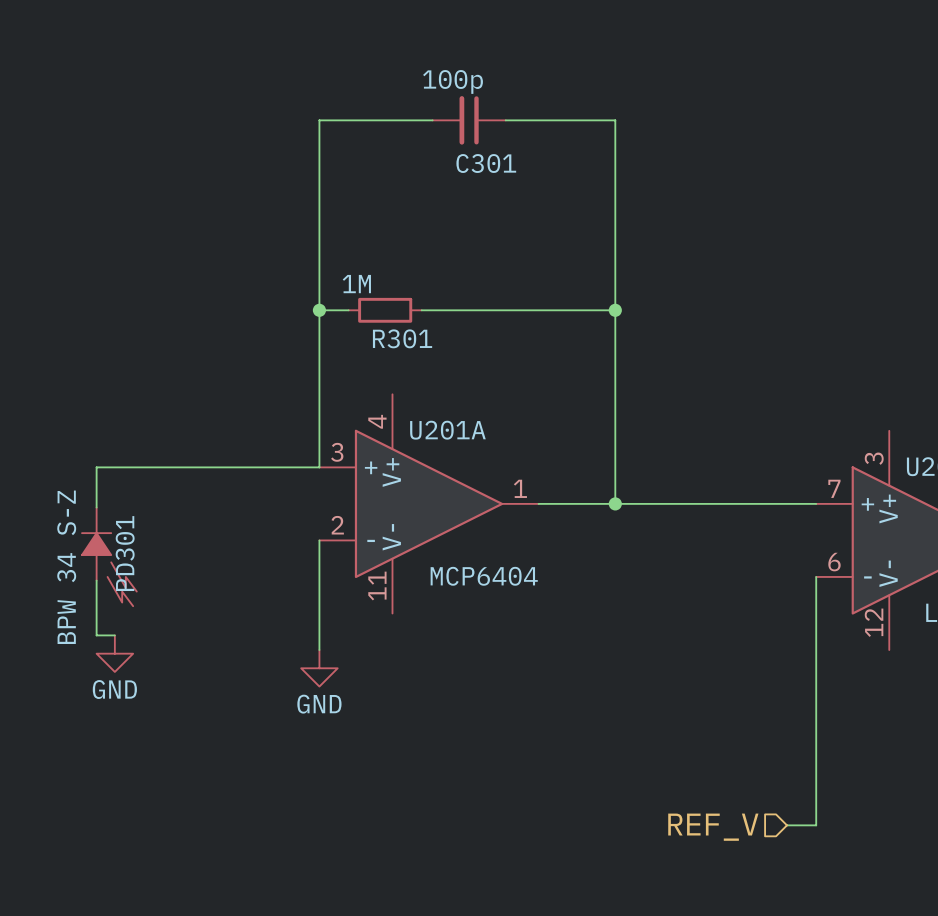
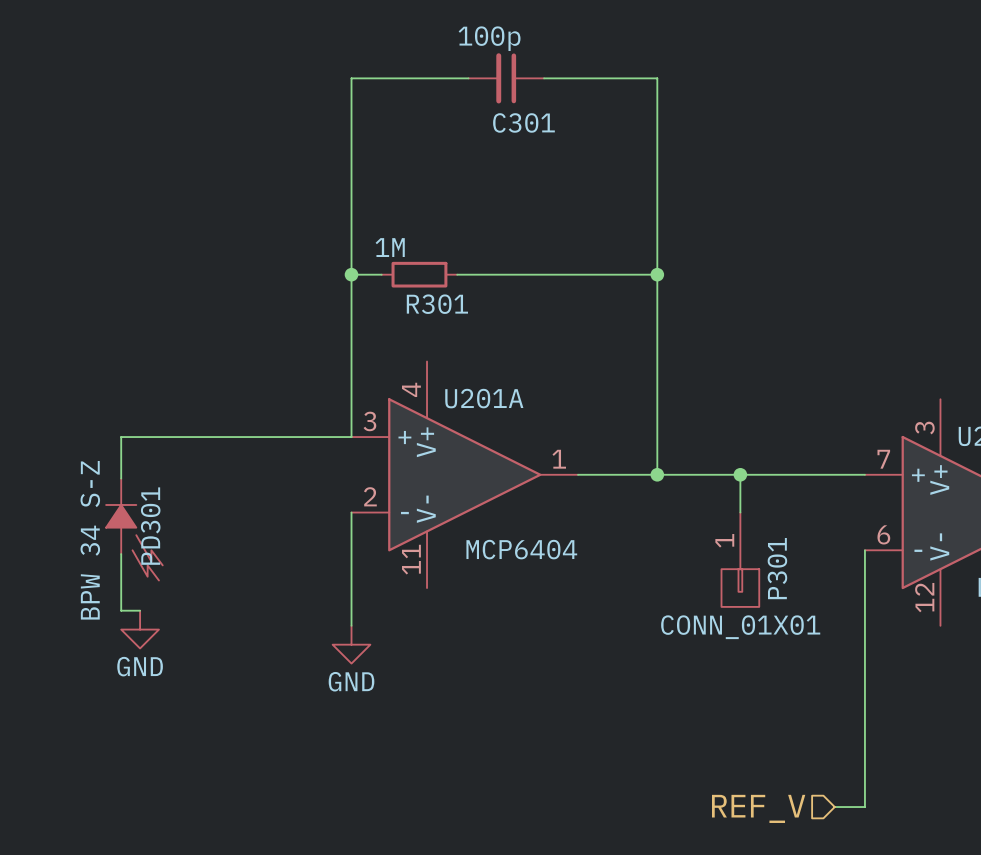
wire: none -> (740, 474) (740, 512)
junction: none -> (740, 474)
P301: none -> CONN_01X01 (740, 559)

